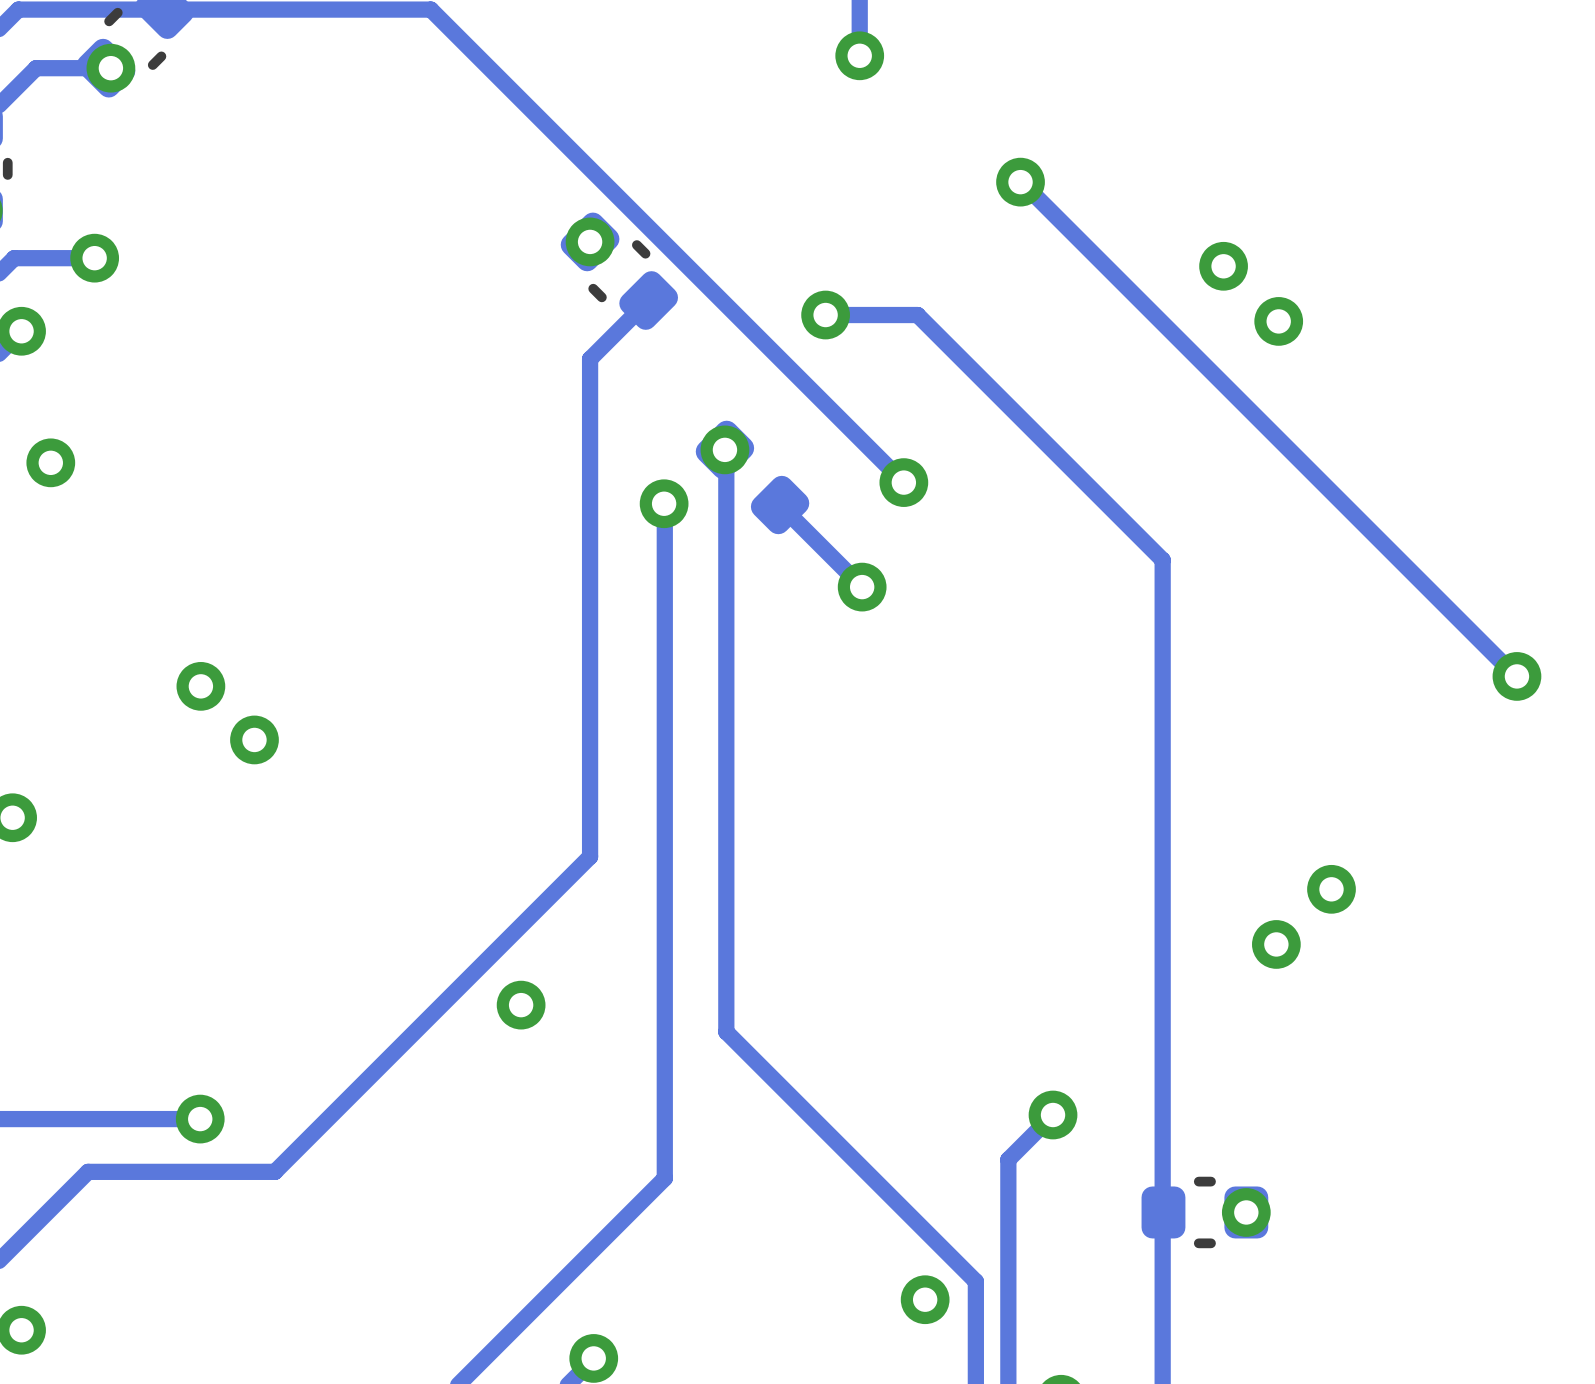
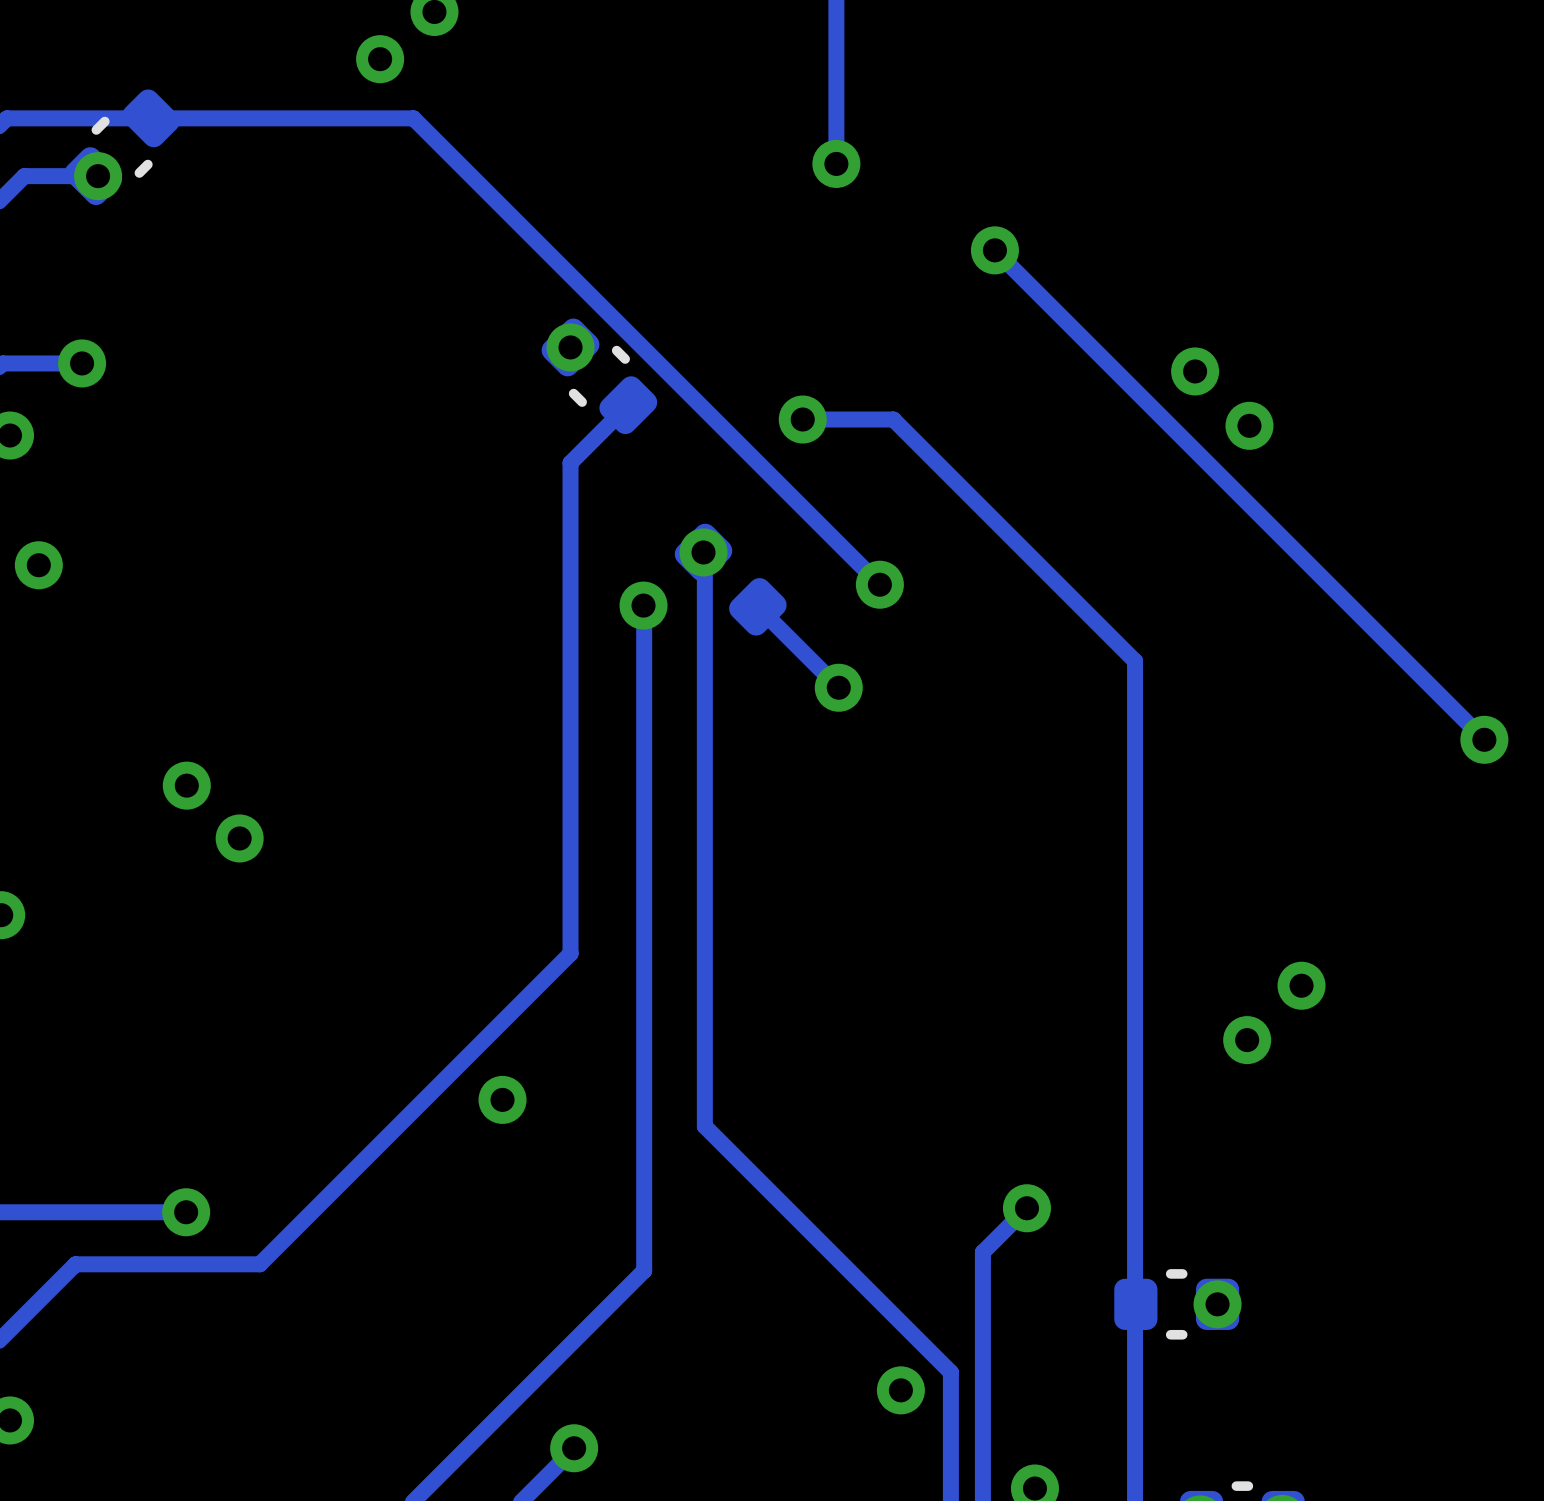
track: none -> (994, 250) (1484, 739)
via position: (1020, 182) -> (994, 250)
track: (1021, 182) (1515, 676) -> none
via position: (1516, 676) -> (1484, 739)

